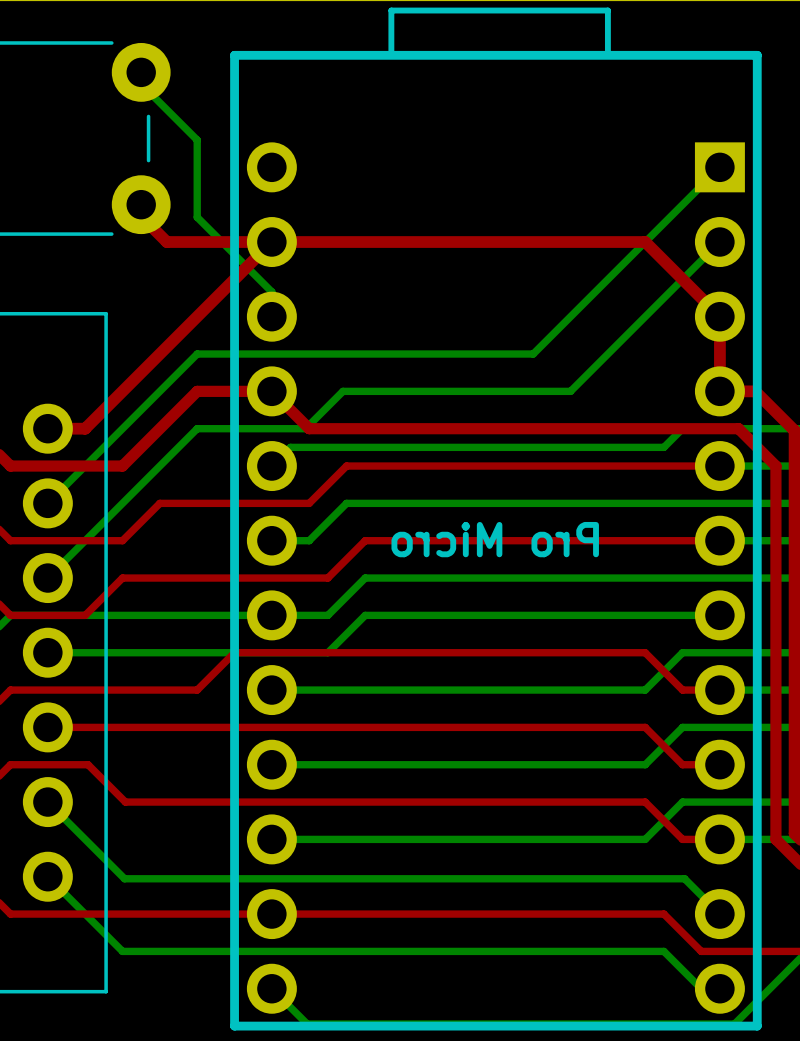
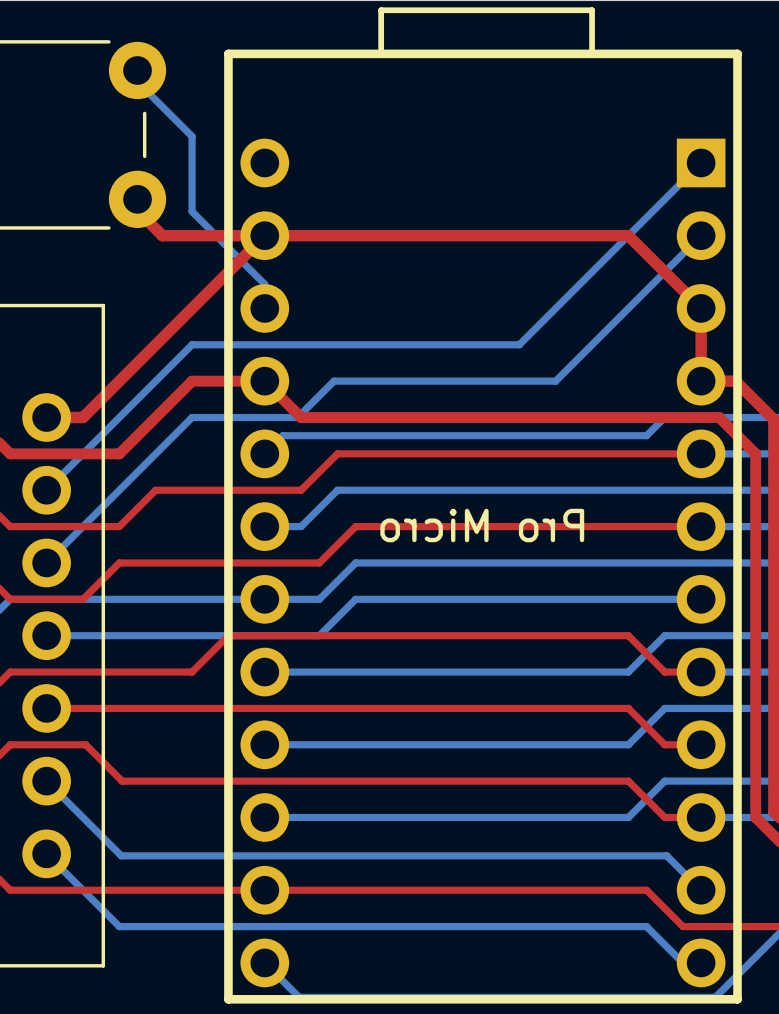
part footprint: [230, 7, 762, 1031] -> [224, 7, 742, 1004]

